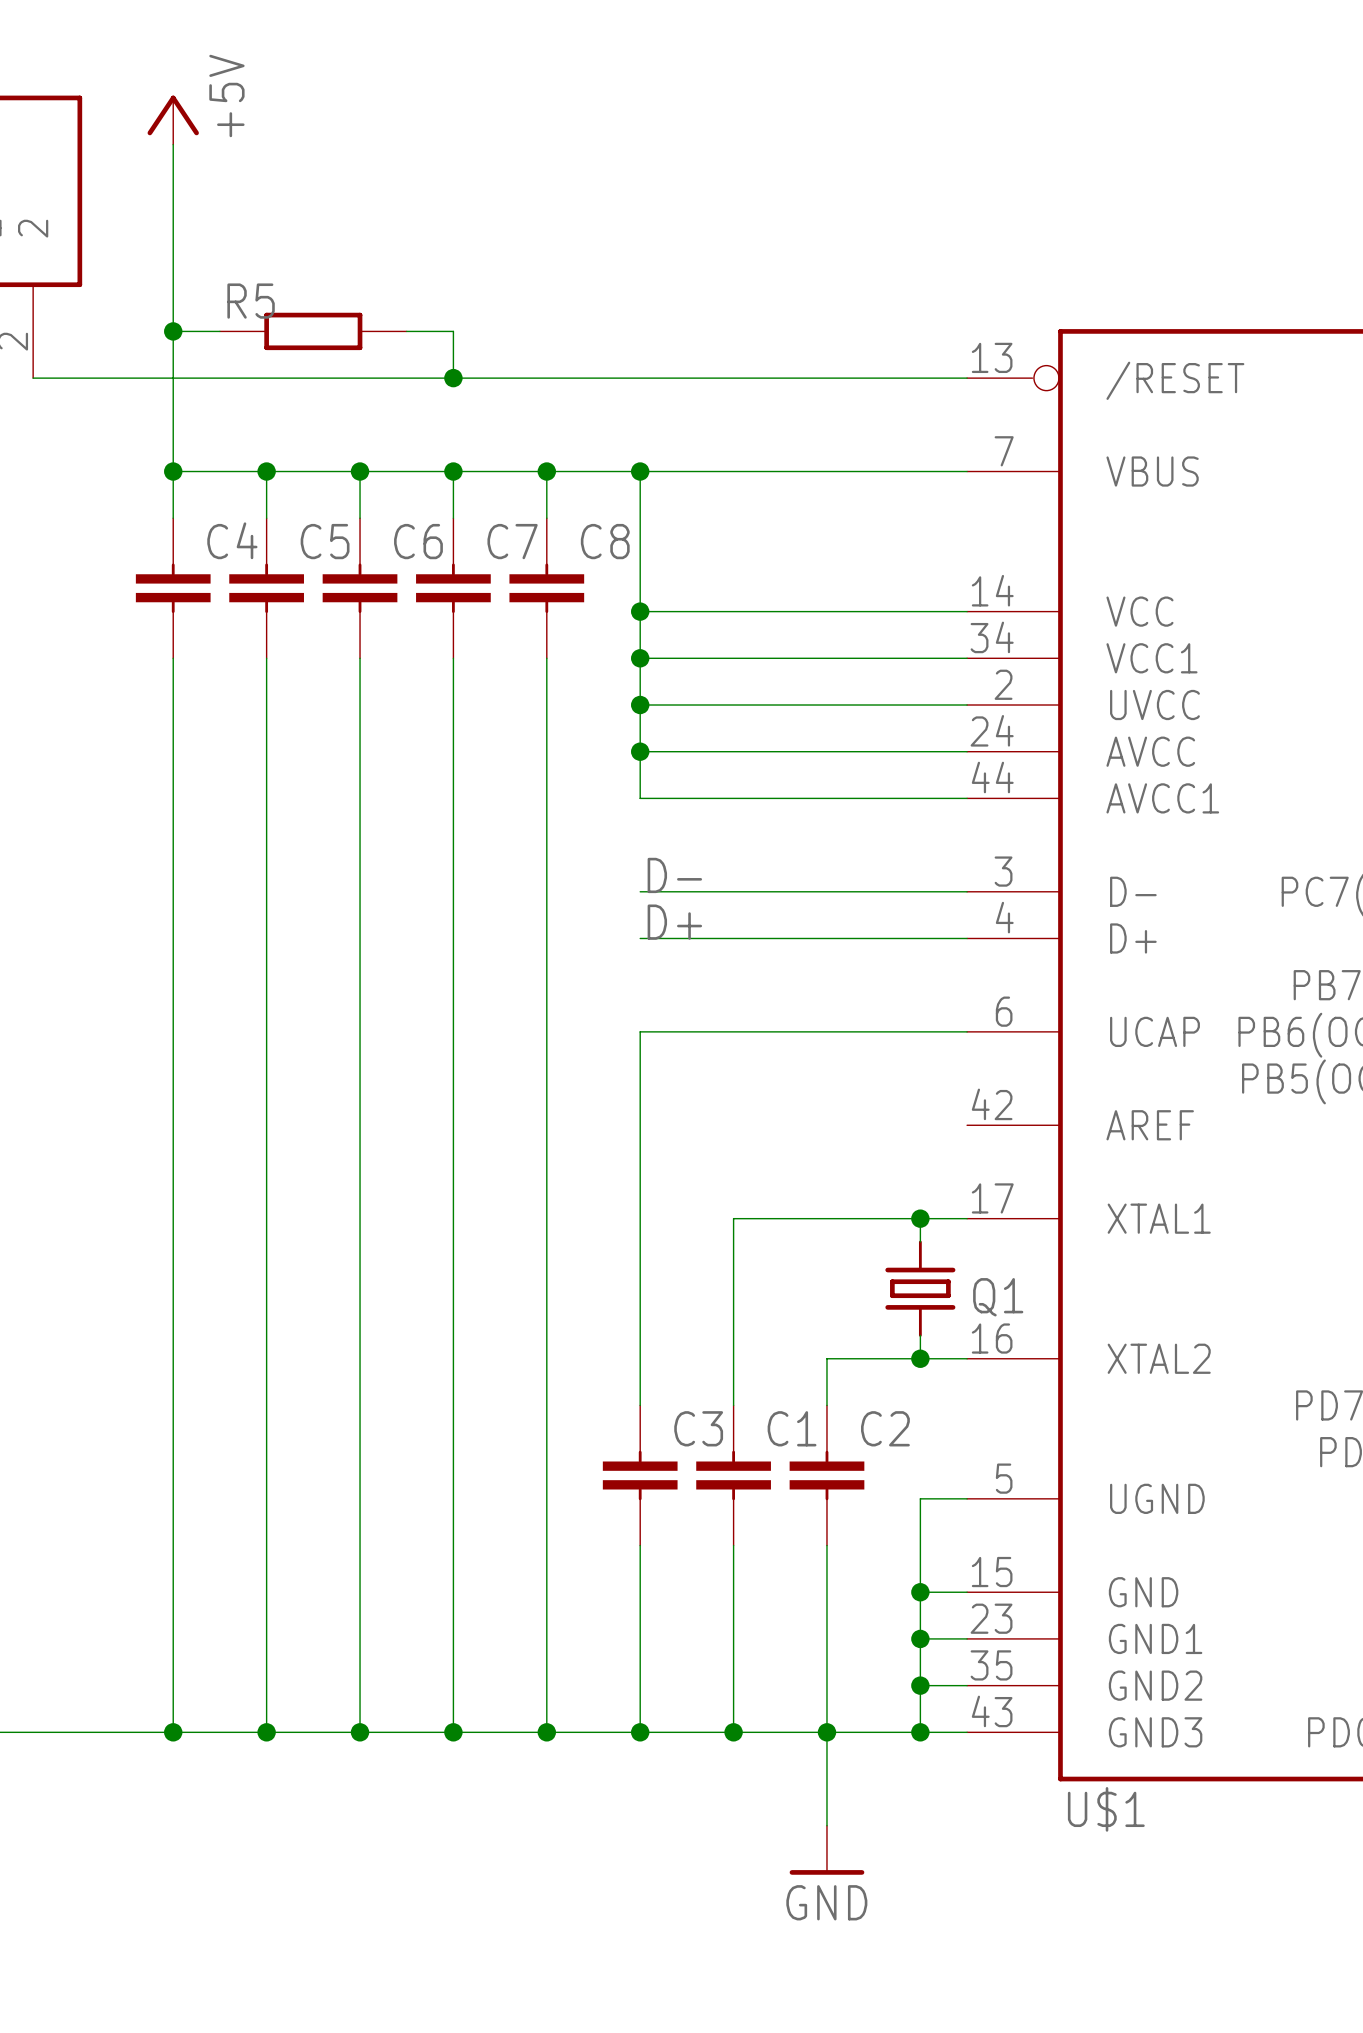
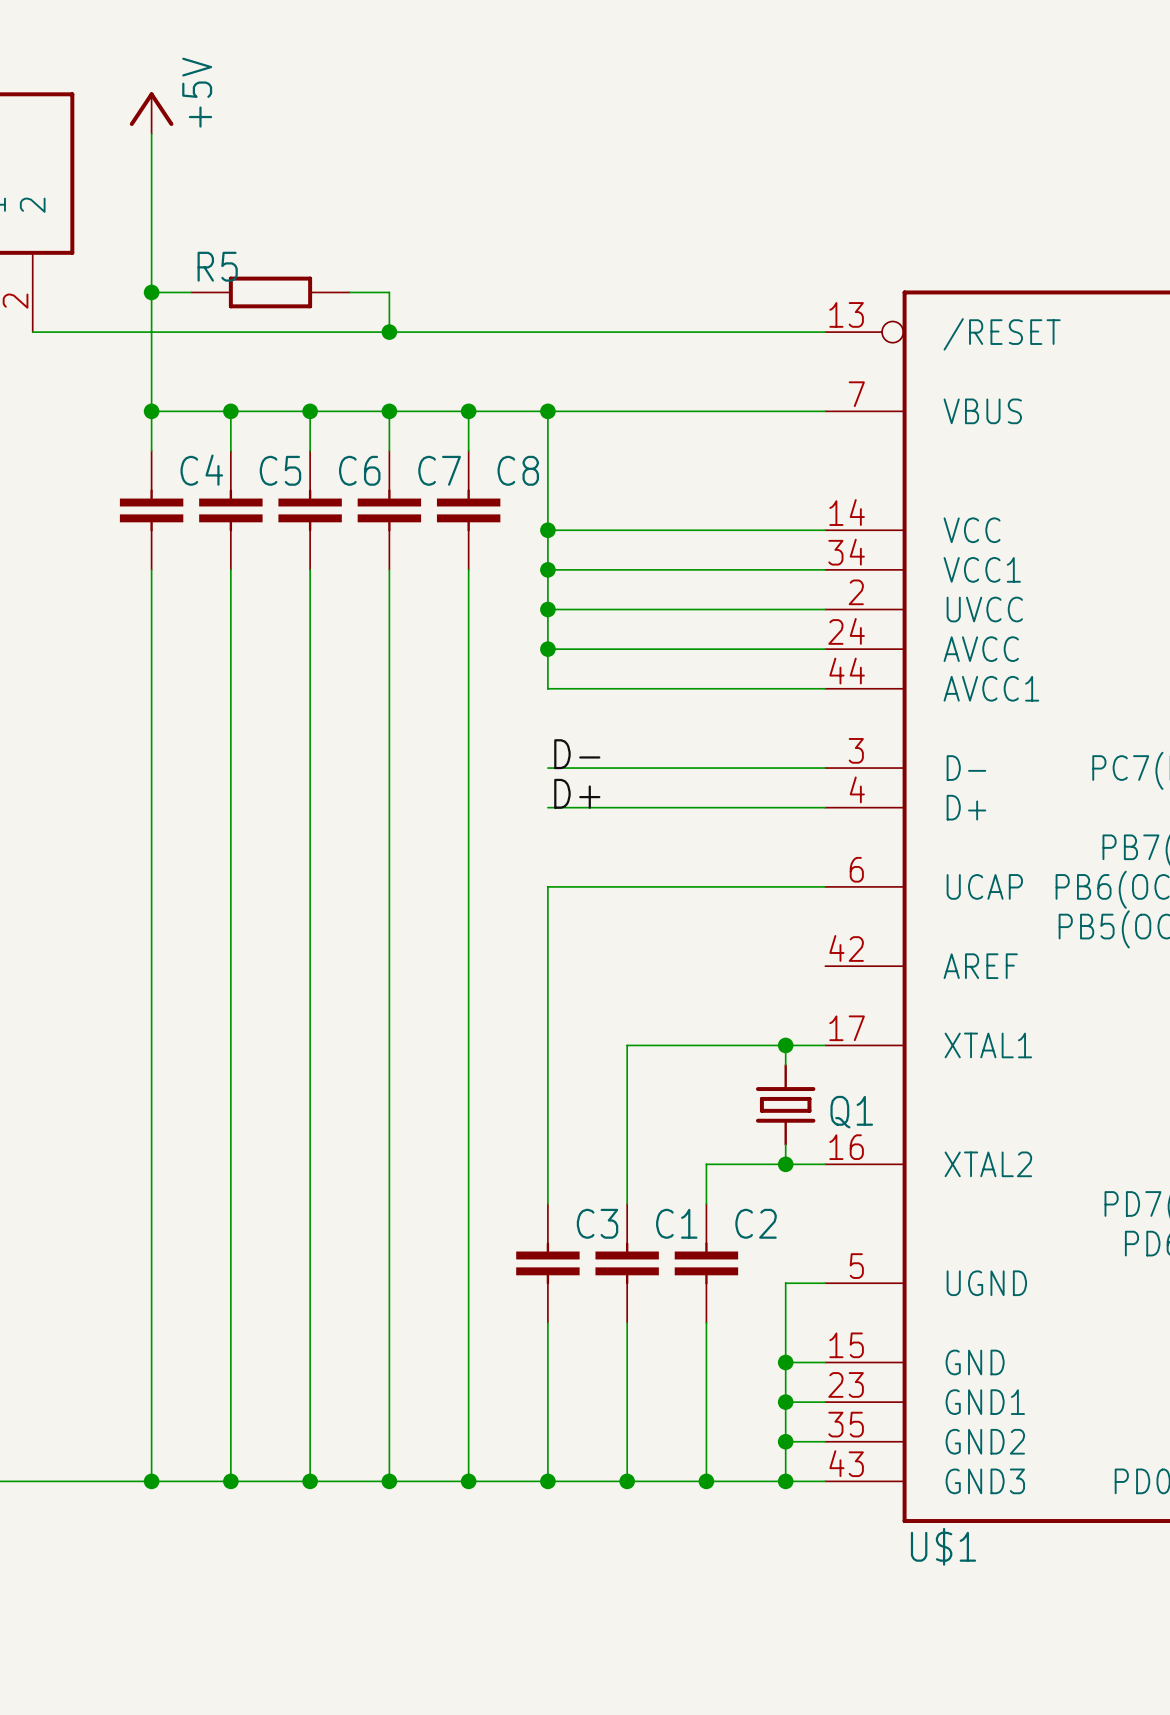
wire: (826, 1732) (826, 1825) -> none
power symbol: GND (826, 1850) -> none

